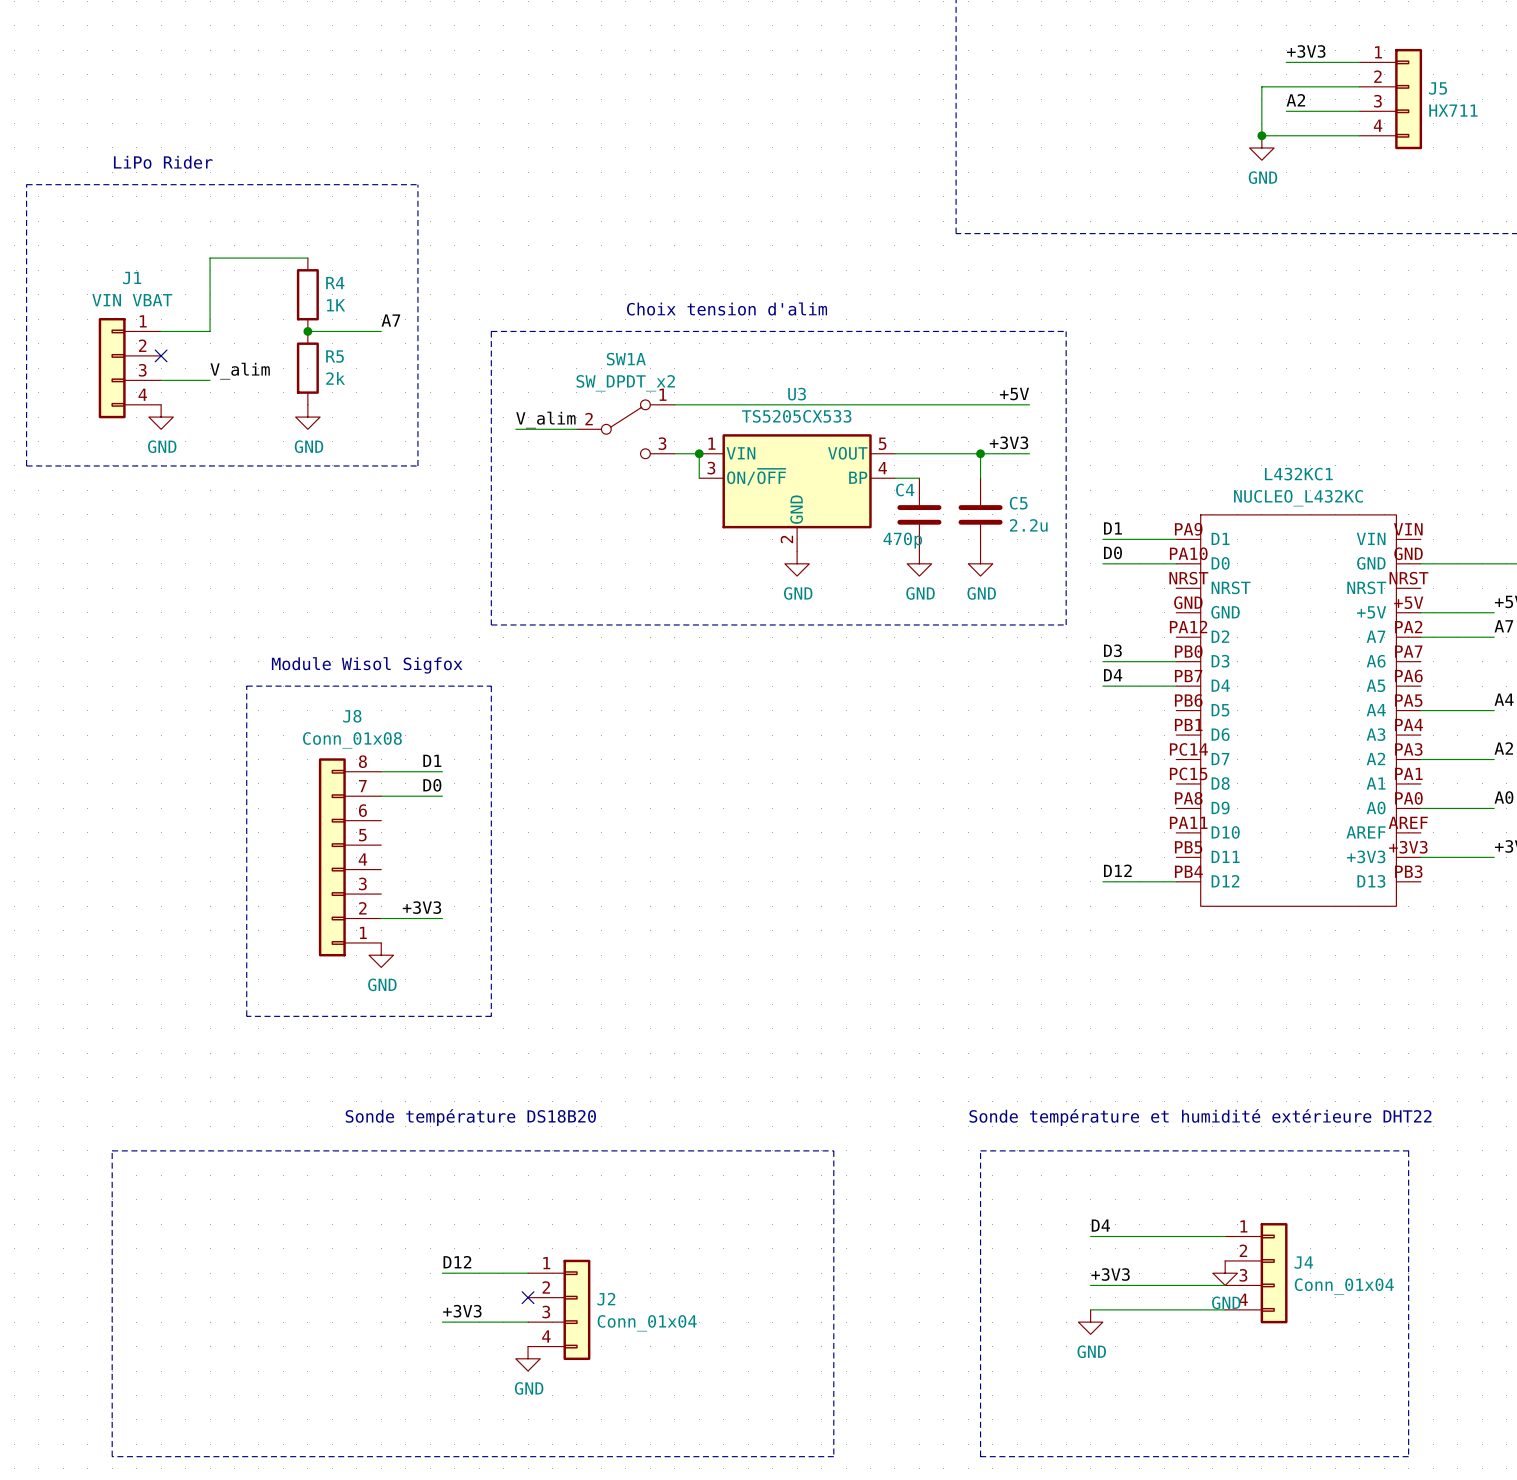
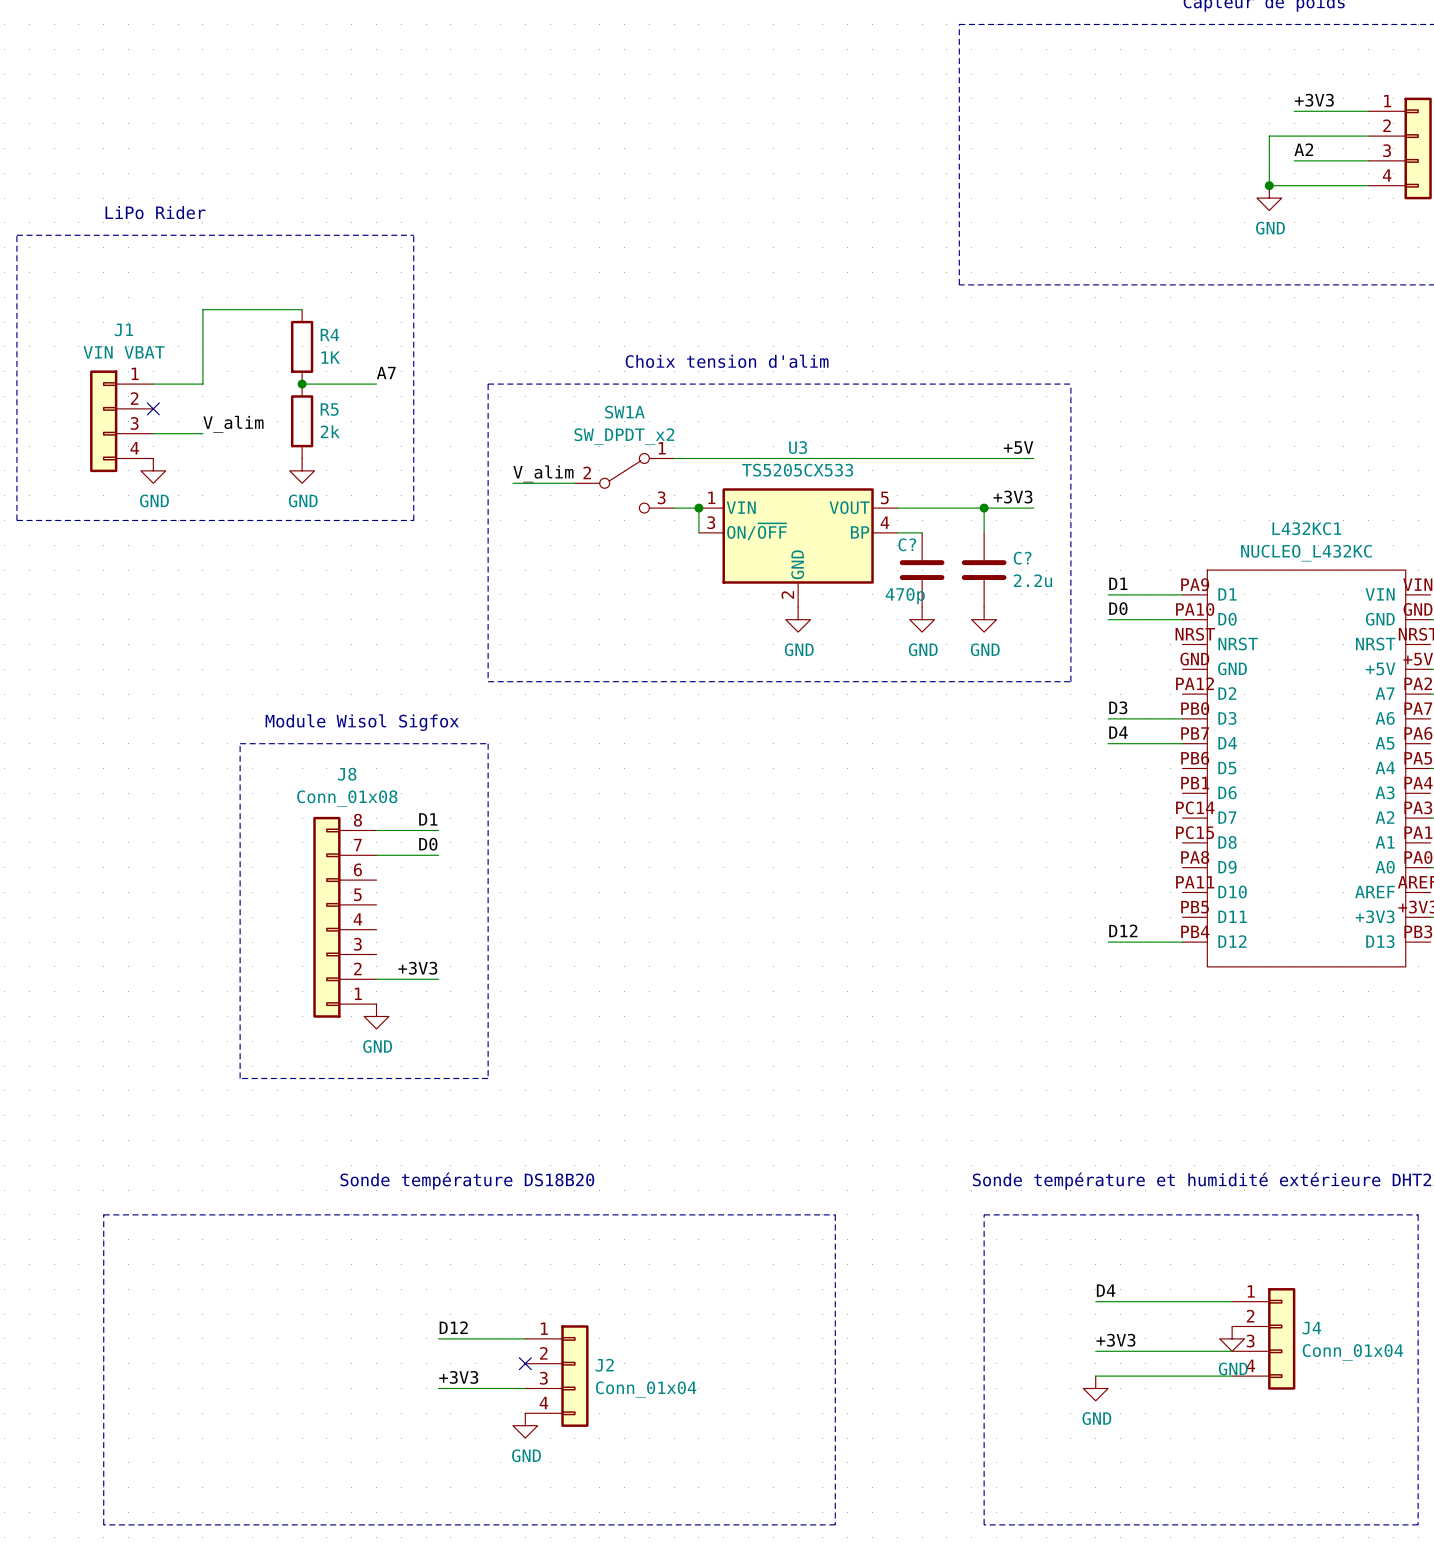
C4 name: C4 (905, 490) -> C? (907, 544)
C5 name: C5 (1018, 503) -> C? (1022, 558)

